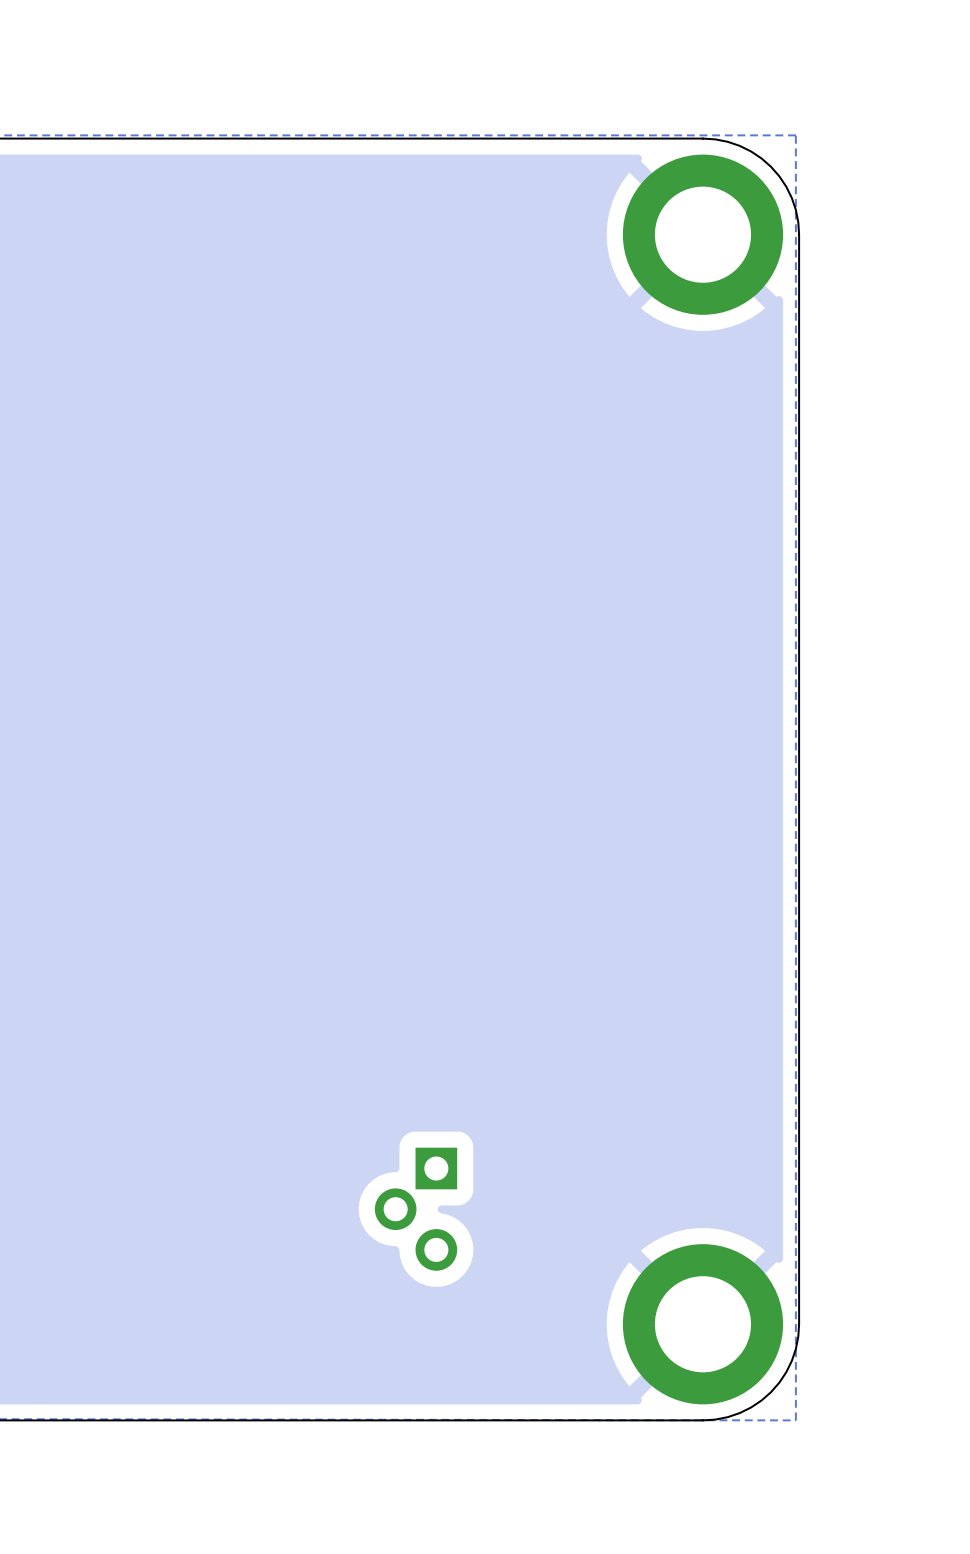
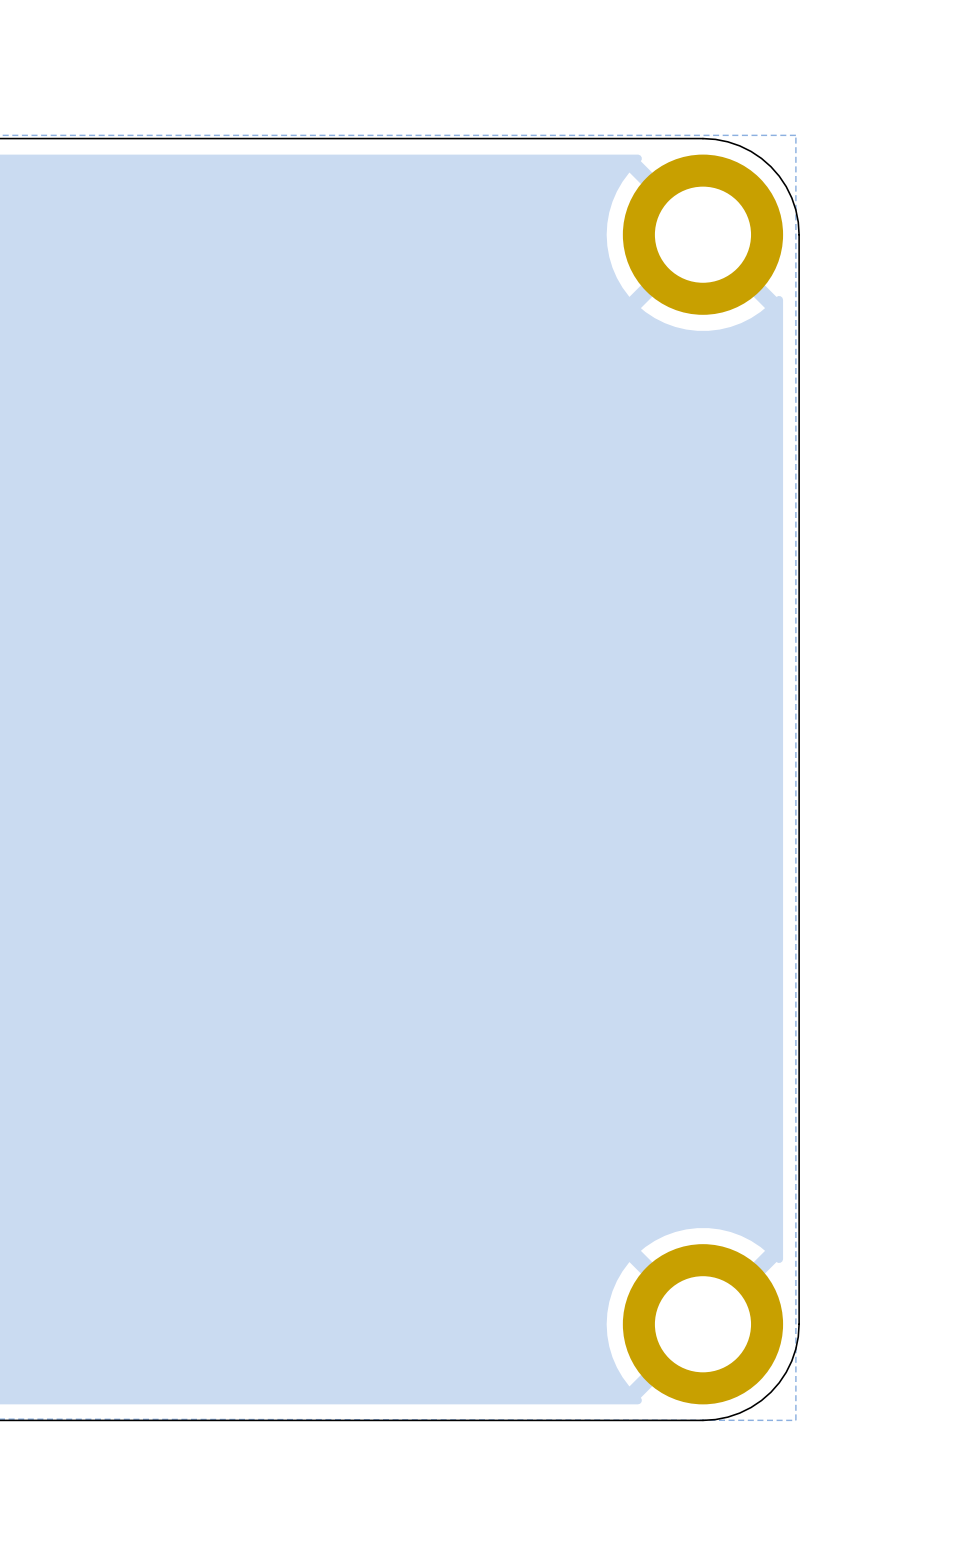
part: (416, 1209) -> none

